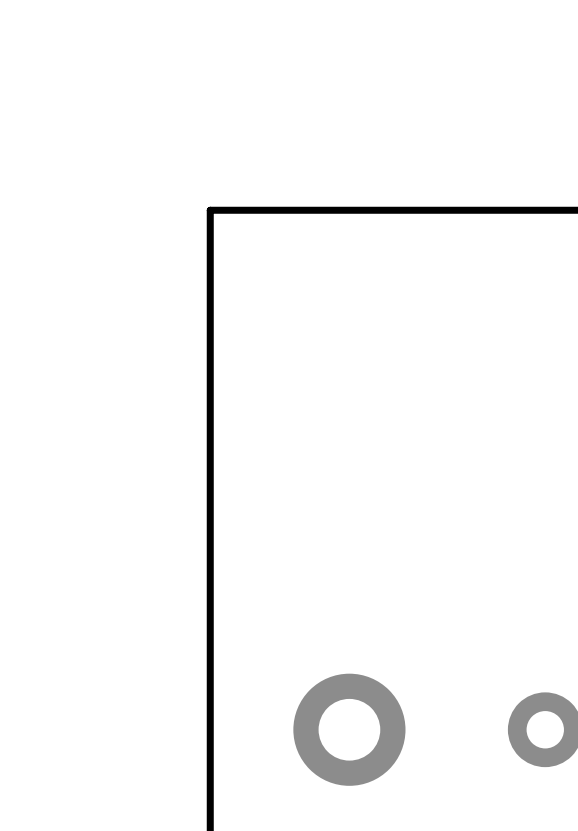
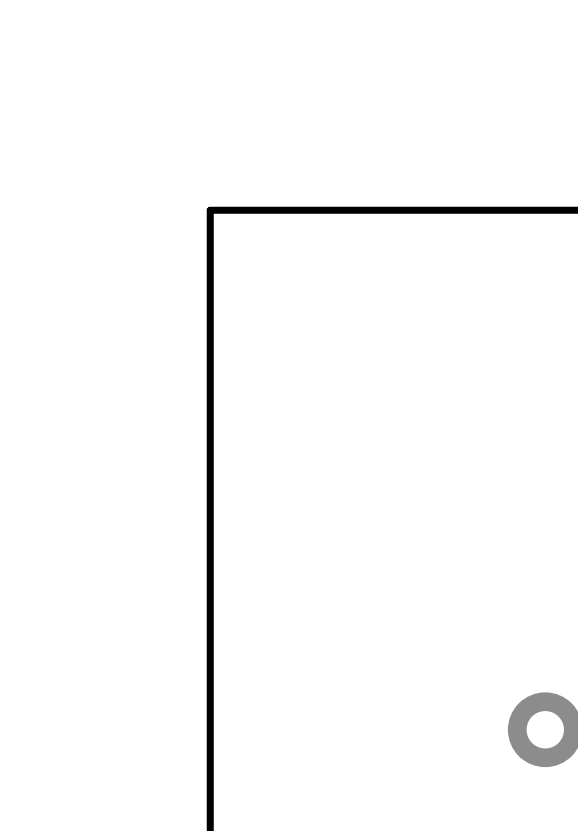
part: (349, 729) -> none

